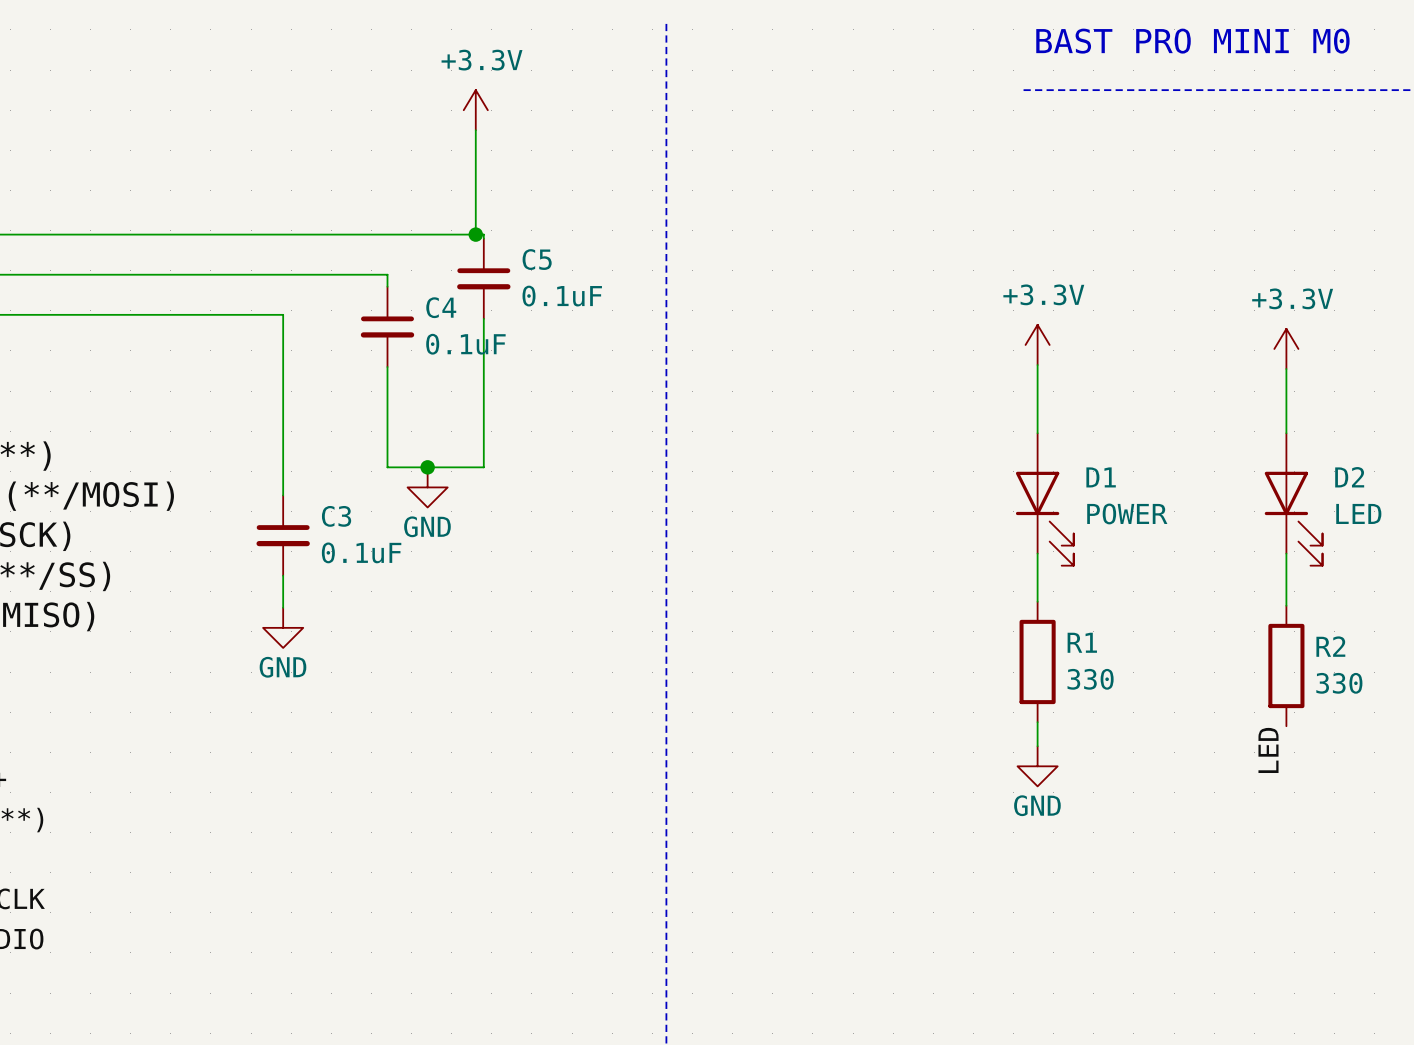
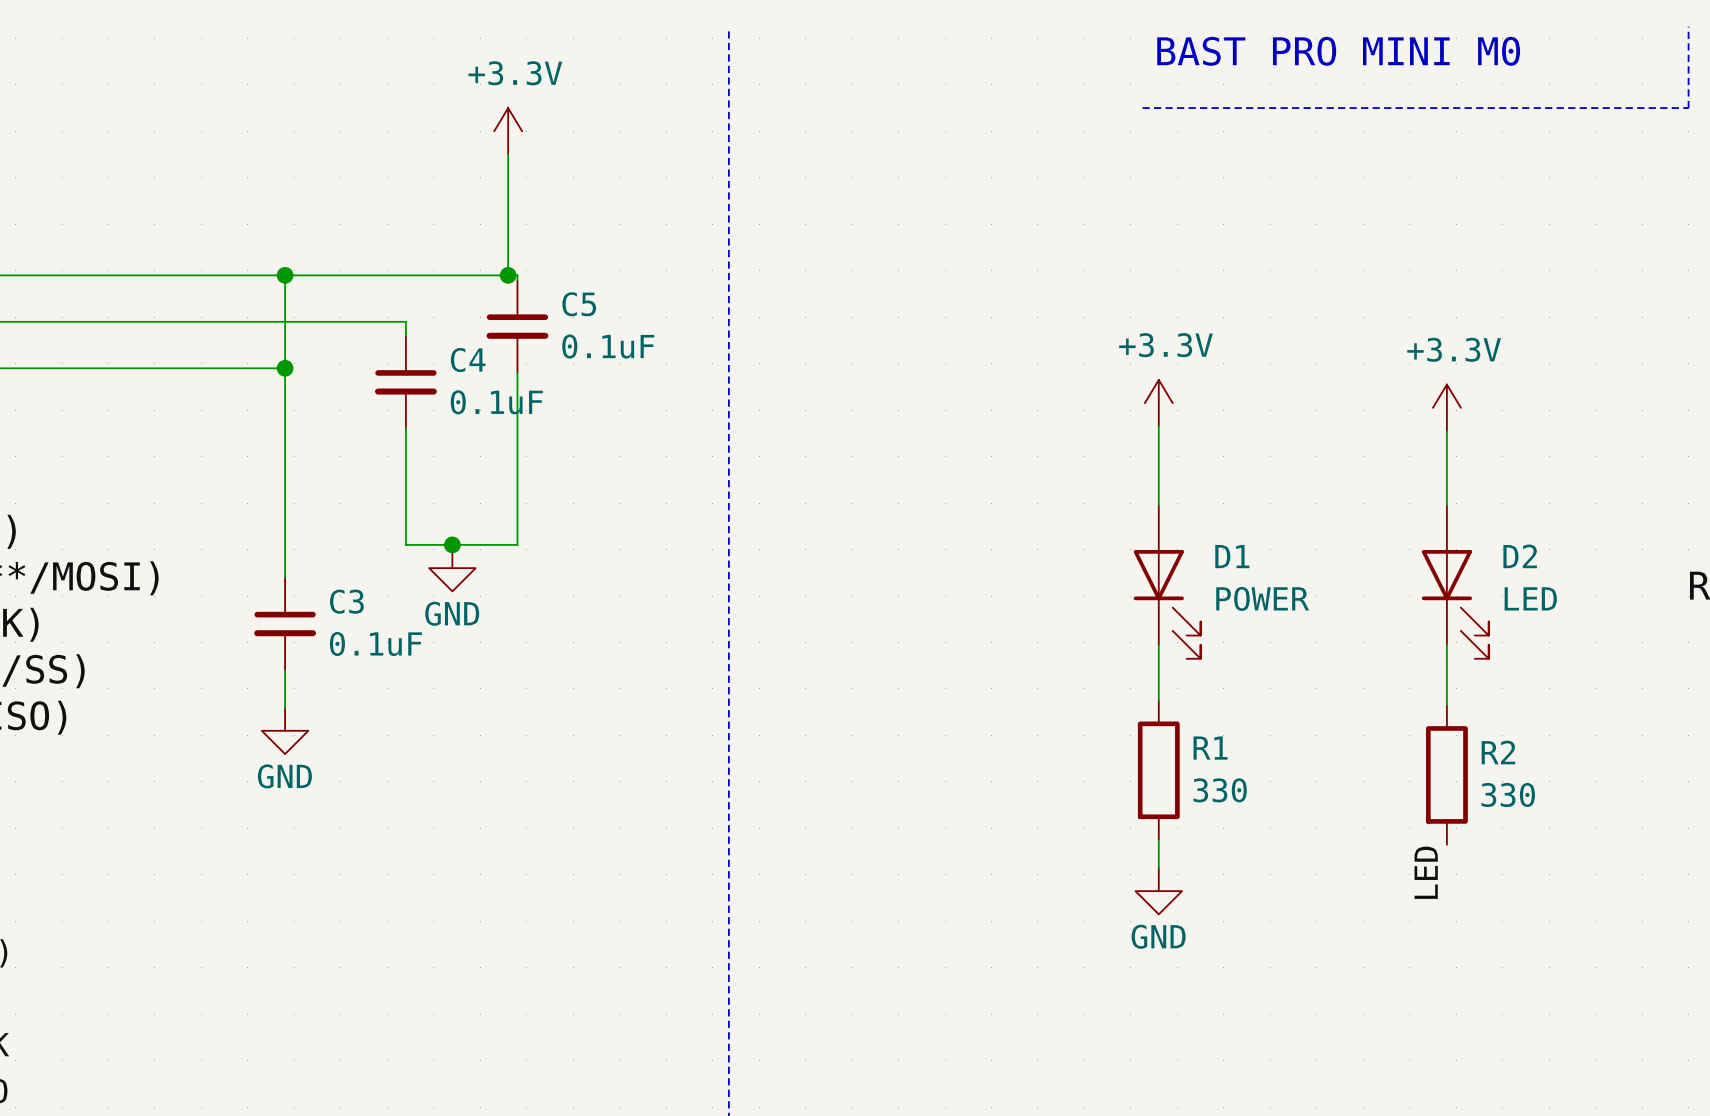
wire: none -> (285, 275) (285, 368)
junction: none -> (285, 275)
junction: none -> (285, 368)

